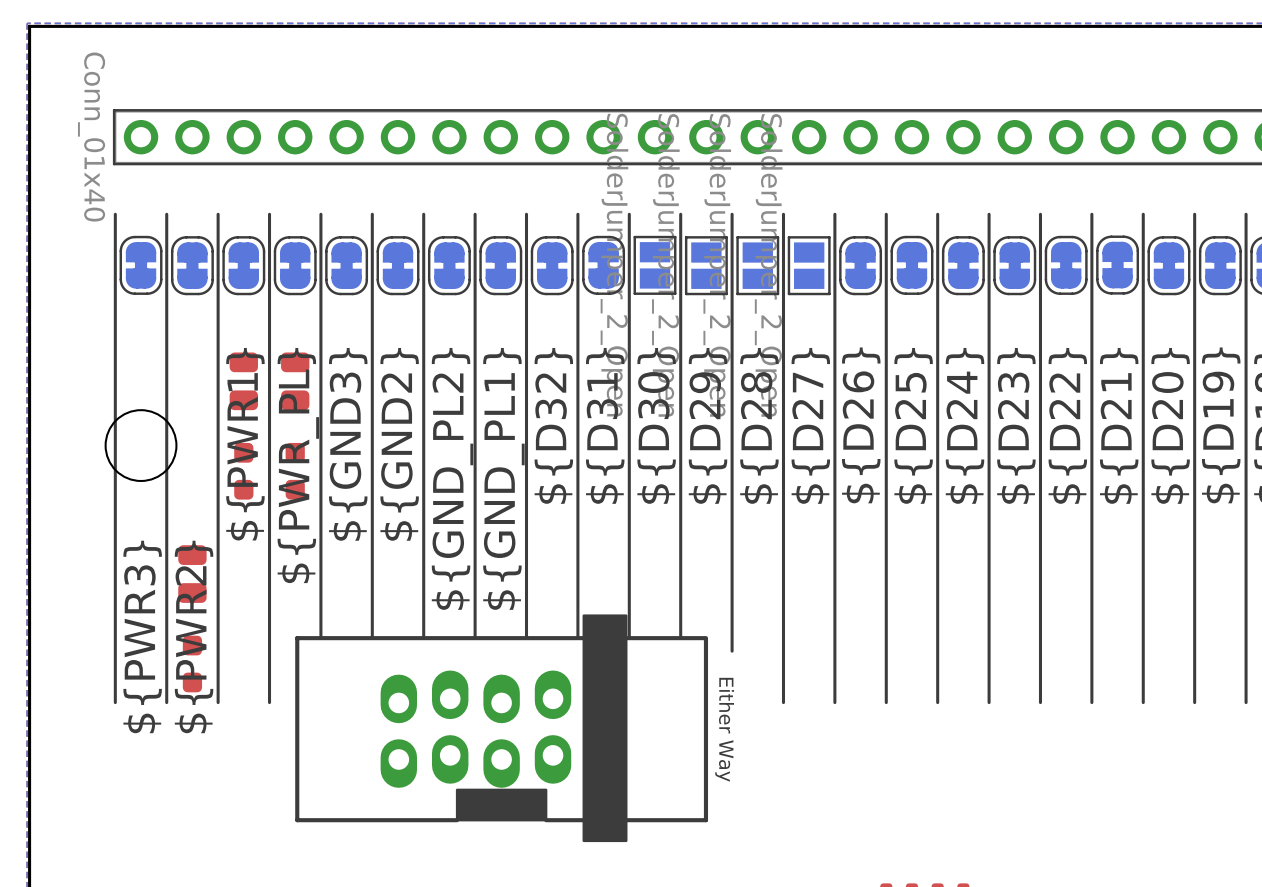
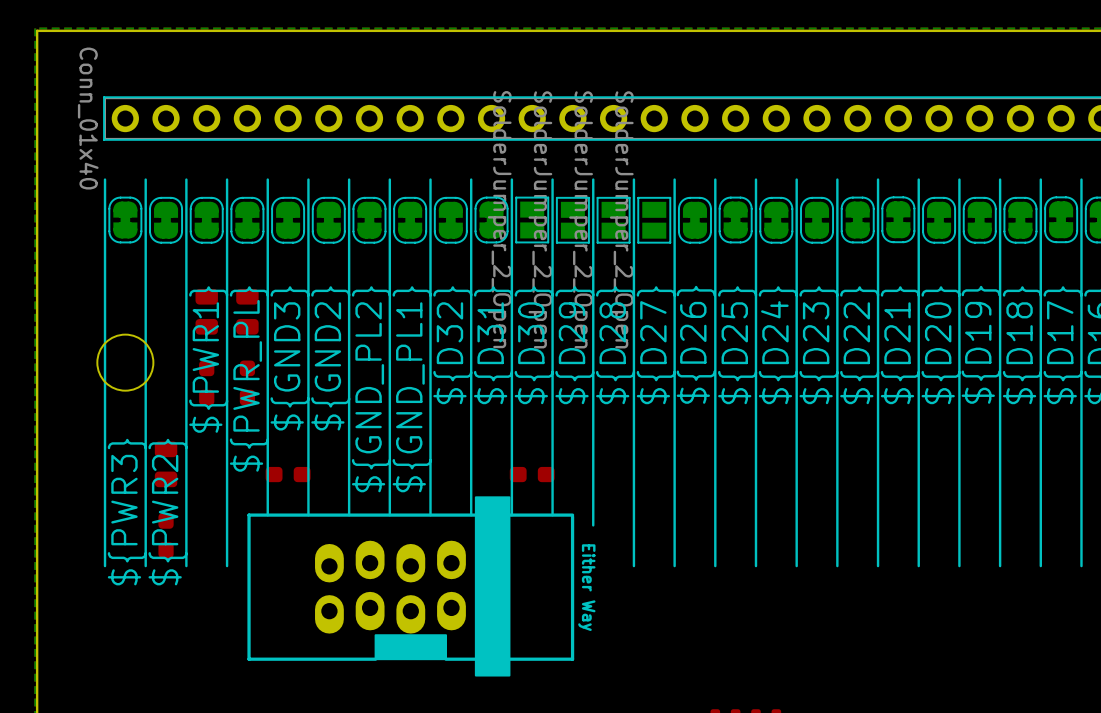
part: none -> (288, 474)
part: none -> (532, 474)

